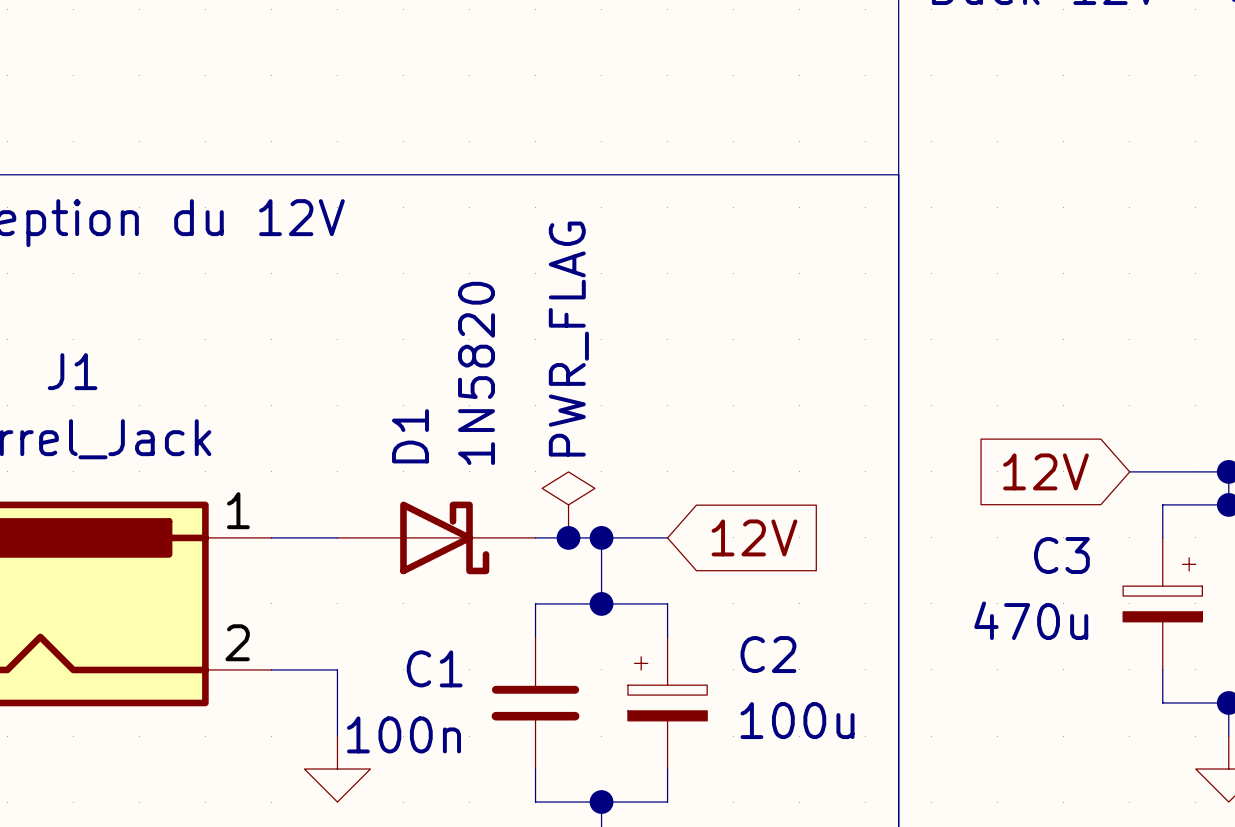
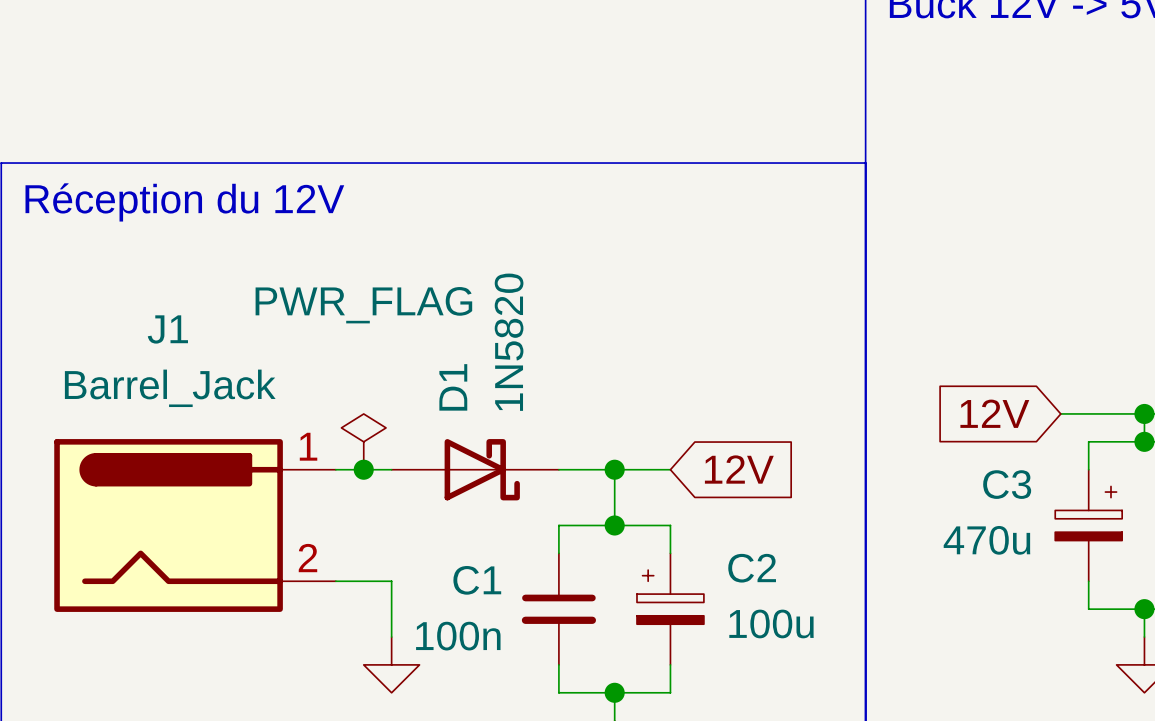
power symbol text rotation: 0° (568, 339) -> 90° clockwise (363, 305)
power symbol position: PWR_FLAG (568, 504) -> PWR_FLAG (363, 441)
junction: none -> (363, 469)
junction: (568, 537) -> none

